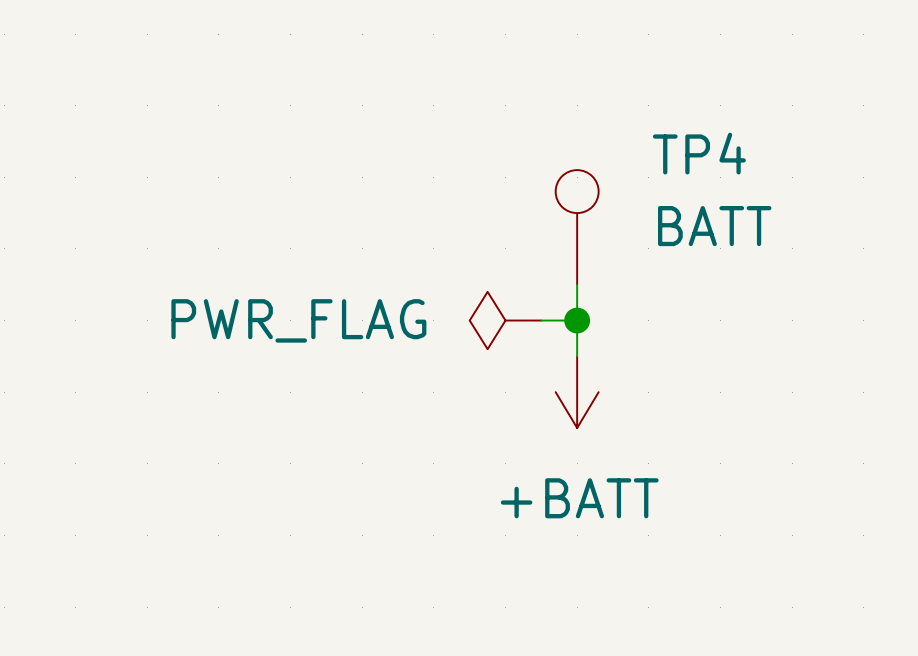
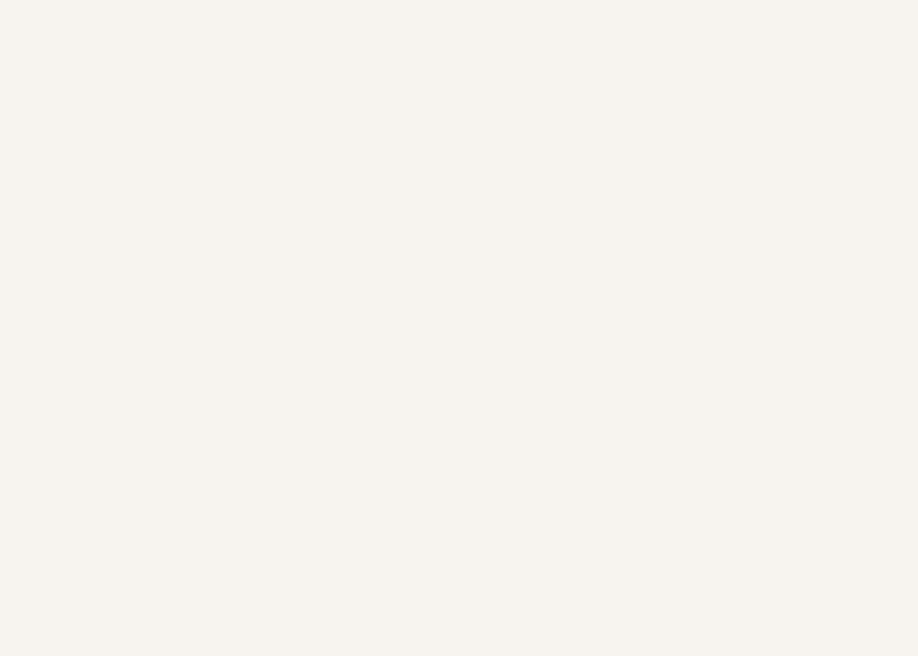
TP4: BATT (577, 227) -> none
wire: (577, 284) (577, 356) -> none
power symbol: PWR_FLAG (505, 320) -> none
wire: (541, 320) (577, 320) -> none
junction: (577, 320) -> none
power symbol: +BATT (577, 392) -> none

